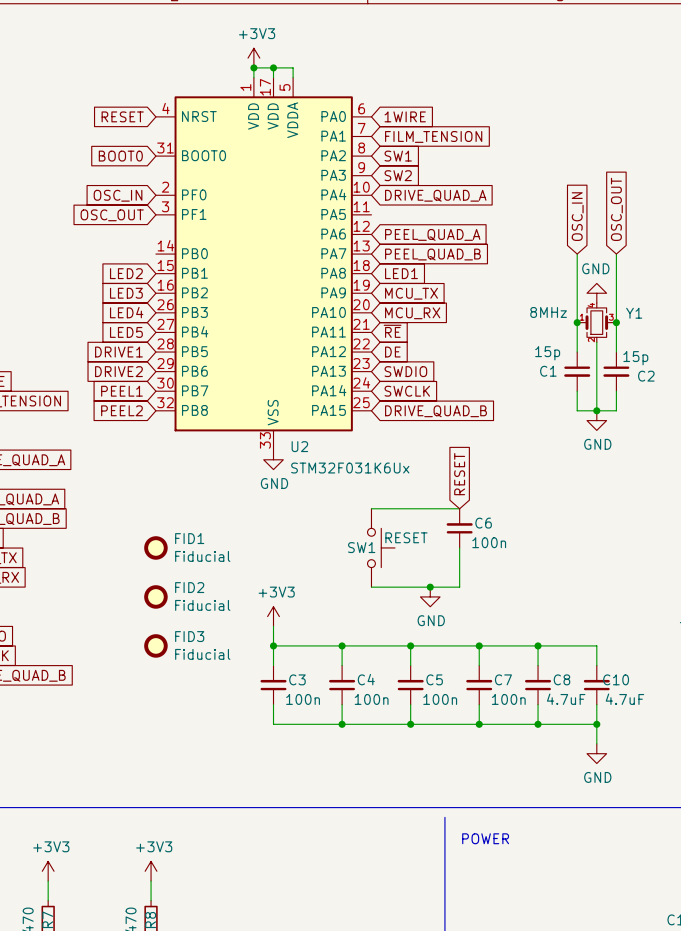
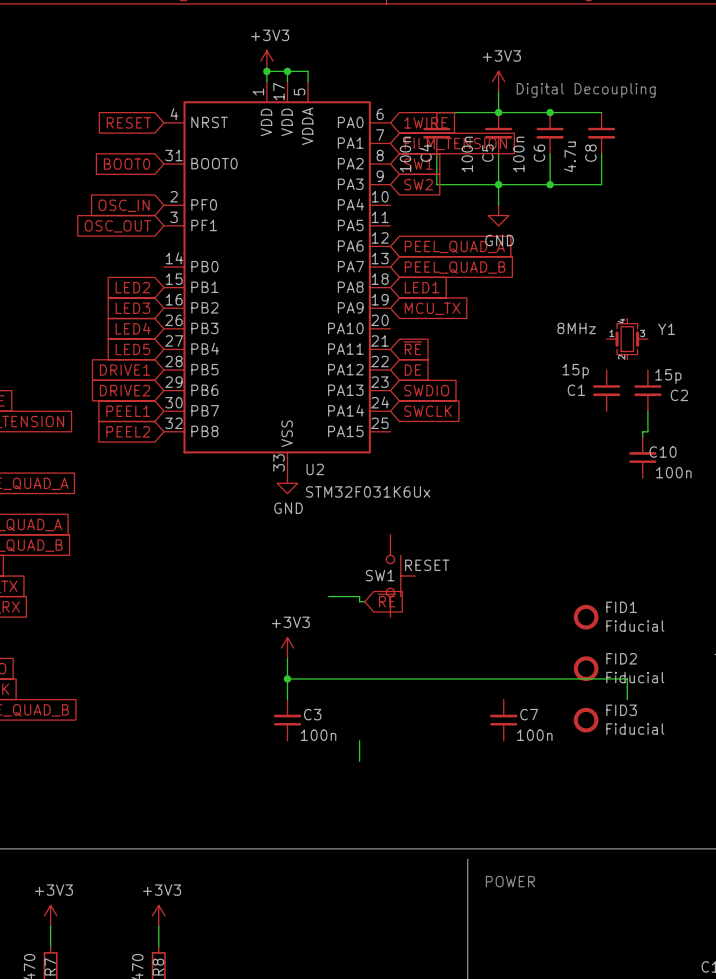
power symbol: none -> +3V3 (498, 81)
text: none -> Digital Decoupling (586, 90)
wire: none -> (498, 91) (498, 112)
wire: none -> (436, 112) (601, 112)
junction: none -> (498, 112)
junction: none -> (550, 112)
wire: none -> (436, 153) (436, 184) (601, 184) (601, 153)
wire: none -> (498, 153) (498, 205)
wire: none -> (550, 153) (550, 184)
junction: none -> (498, 184)
junction: none -> (550, 184)
global label: DRIVE_QUAD_A (435, 195) -> none
power symbol: none -> GND (498, 215)
global label: OSC_OUT (616, 209) -> none
global label: OSC_IN (577, 216) -> none
wire: (577, 254) (577, 352) -> none
wire: (616, 254) (616, 352) -> none
power symbol: GND (596, 293) -> none
global label: MCU_RX (412, 313) -> none
junction: (577, 322) -> none
junction: (616, 322) -> none
wire: (596, 342) (596, 410) -> none
wire: (577, 391) (577, 410) (611, 410) -> (642, 436) (642, 431)
junction: (596, 410) -> none
global label: DRIVE_QUAD_B (435, 411) -> none
power symbol: GND (596, 420) -> none
global label: RESET (459, 474) -> none
wire: (371, 508) (459, 508) -> none
C6 name position: C6 (483, 523) -> C6 (539, 153)
C6 rotation: 0° (459, 528) -> 180° (550, 133)
C6 position: (459, 528) -> (550, 133)
C6 value position: 100n (489, 542) -> 100n (518, 154)
FID1 position: (155, 547) -> (586, 617)
wire: (459, 547) (459, 587) (371, 587) -> none
wire: none -> (328, 596) (359, 596) (359, 601) (364, 601)
global label: none -> ~{RE} (386, 600)
junction: (430, 587) -> none
FID2 position: (155, 596) -> (586, 668)
power symbol: GND (430, 596) -> none
FID3 position: (155, 645) -> (586, 720)
wire: (342, 645) (342, 665) -> none
junction: (342, 645) -> none
wire: (410, 645) (410, 665) -> none
junction: (410, 645) -> none
wire: (479, 645) (479, 665) -> none
junction: (479, 645) -> none
wire: (538, 645) (538, 665) -> none
junction: (538, 645) -> none
C4 name position: C4 (366, 679) -> C4 (425, 152)
C5 name position: C5 (434, 679) -> C5 (487, 153)
C8 name position: C8 (561, 679) -> C8 (590, 153)
C4 rotation: 0° (342, 685) -> 180° (436, 133)
C4 position: (342, 685) -> (436, 133)
C5 rotation: 0° (410, 685) -> 180° (498, 133)
C5 position: (410, 685) -> (498, 133)
C8 rotation: 0° (538, 685) -> 180° (601, 133)
C8 position: (538, 685) -> (601, 133)
C10 position: (596, 685) -> (642, 457)
C4 value position: 100n (371, 699) -> 100n (405, 154)
C5 value position: 100n (440, 699) -> 100n (467, 154)
C8 value: 4.7uF (566, 699) -> 4.7u (570, 156)
C10 value: 4.7uF (624, 699) -> 100n (673, 472)
wire: (273, 704) (273, 724) (596, 724) -> none
wire: (410, 704) (410, 724) -> none
wire: (479, 704) (479, 724) -> none
wire: (538, 704) (538, 724) -> none
wire: (596, 704) (596, 743) -> none
junction: (342, 724) -> none
junction: (410, 724) -> none
junction: (479, 724) -> none
junction: (538, 724) -> none
junction: (596, 724) -> none
power symbol: GND (596, 753) -> none

